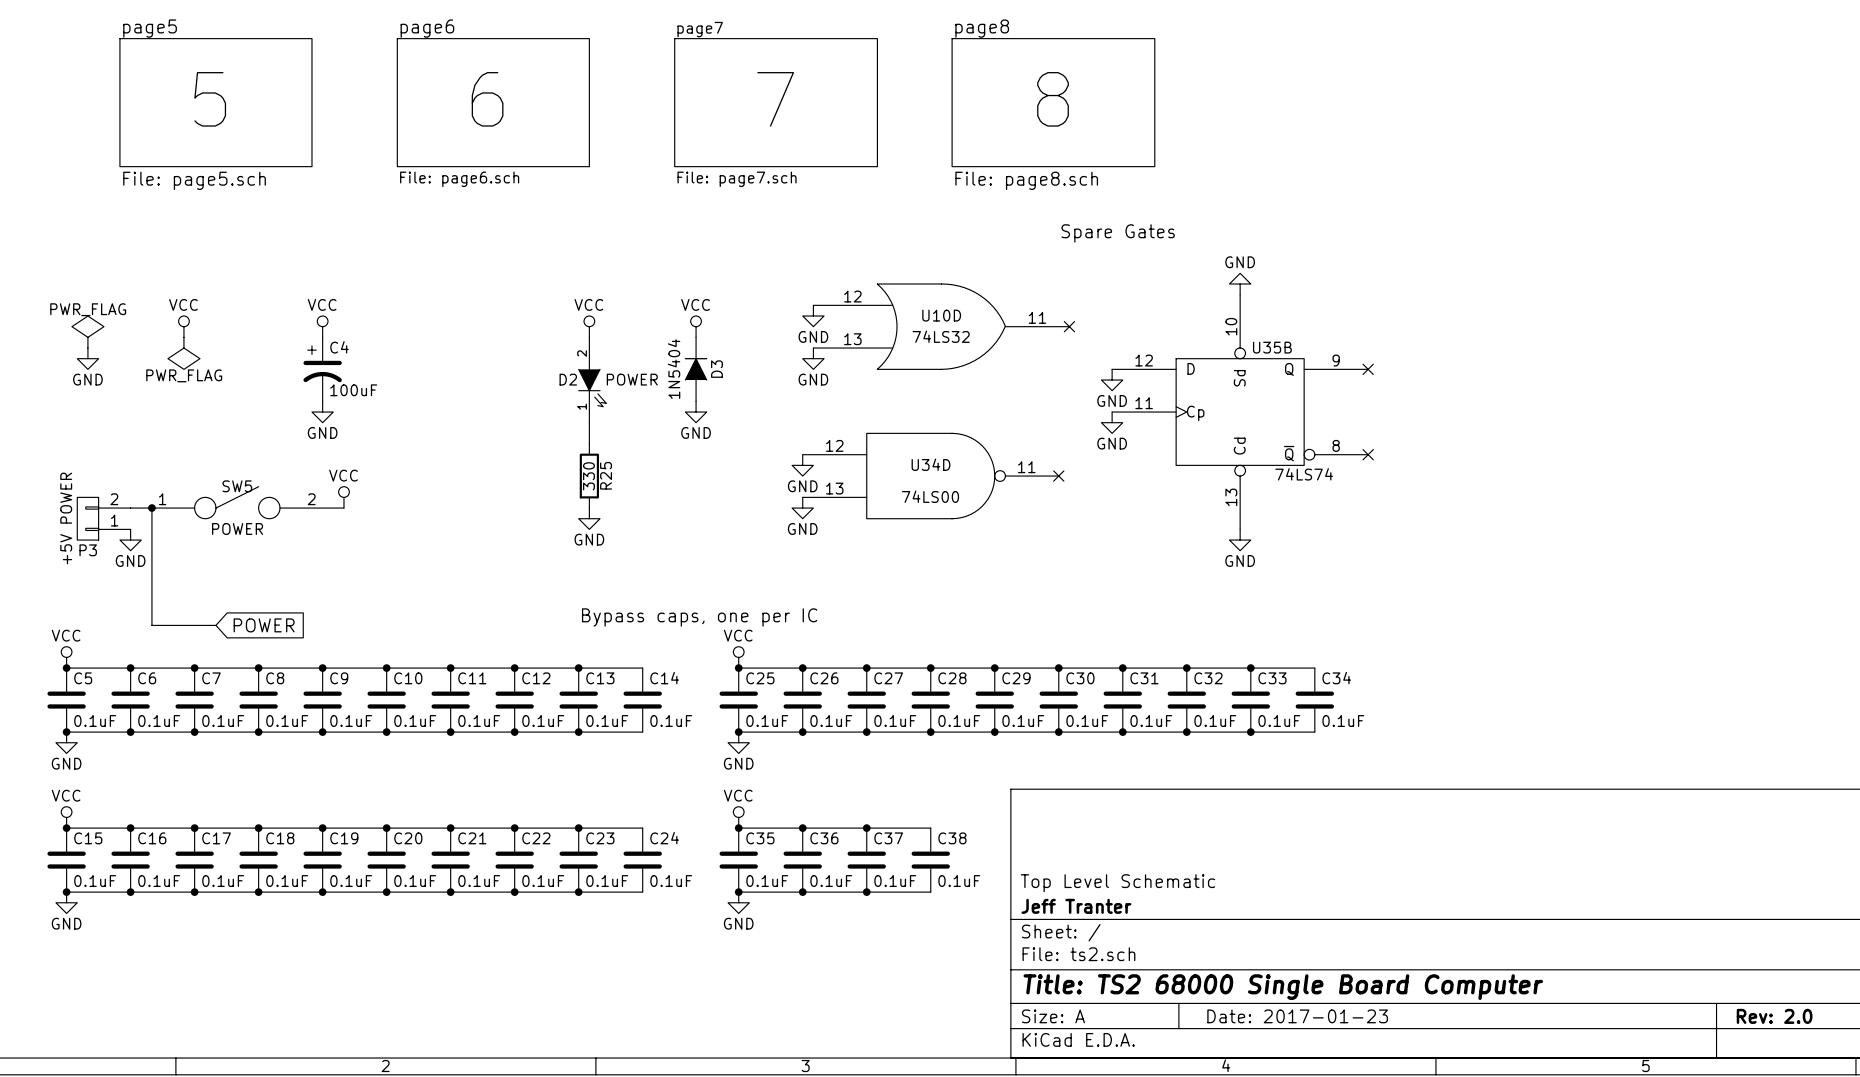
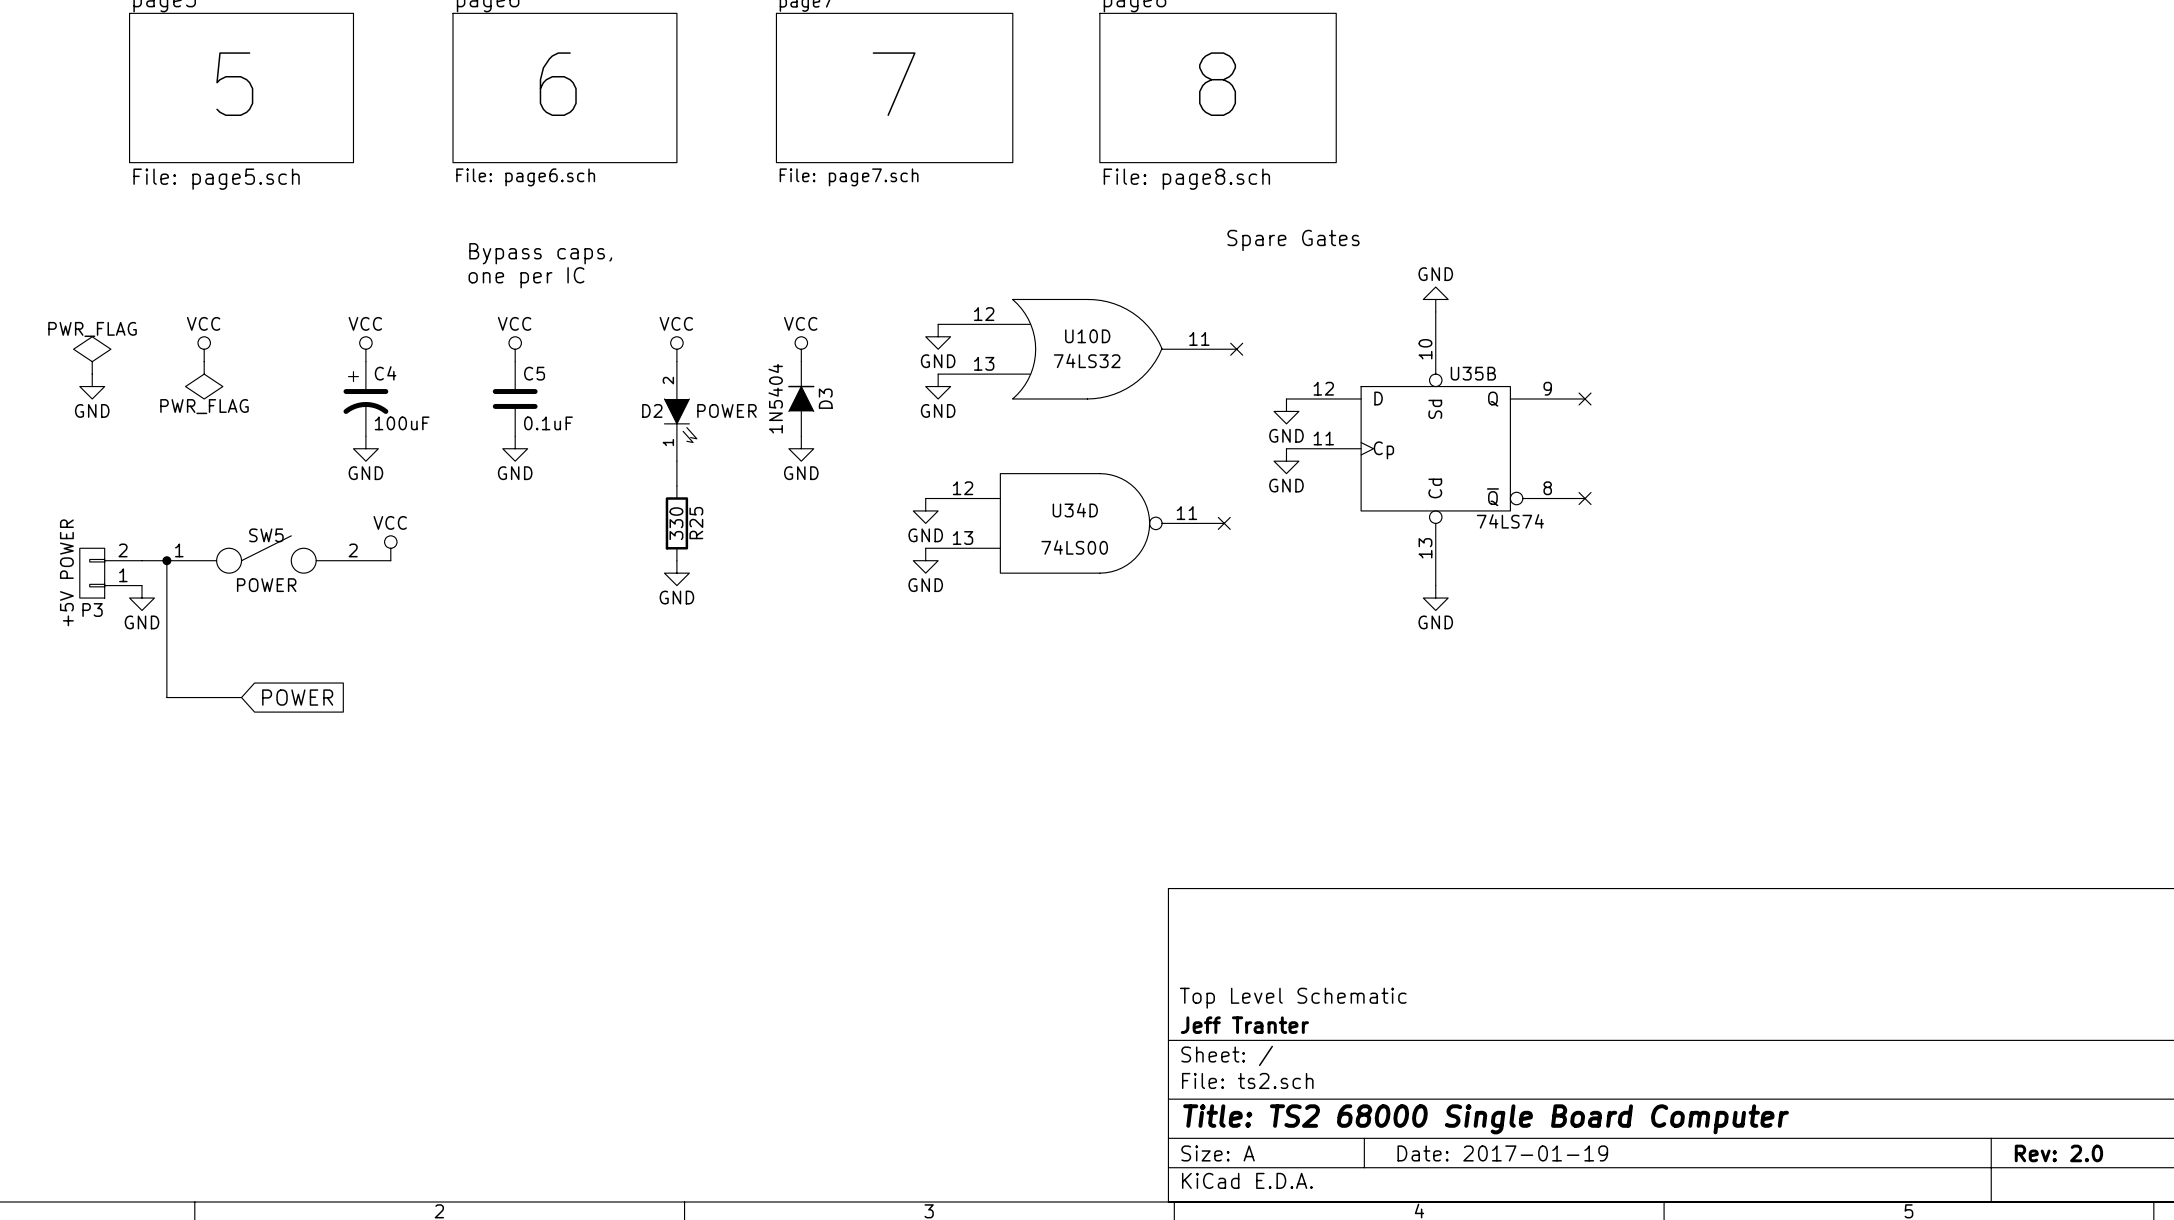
text: none -> Bypass caps, (540, 253)
text: none -> one per IC (526, 277)
power symbol: none -> VCC (515, 349)
power symbol: none -> GND (515, 448)
text: Bypass caps, one per IC (699, 617) -> none
power symbol: VCC (66, 657) -> none
power symbol: VCC (738, 657) -> none
wire: (66, 668) (642, 668) -> none
junction: (66, 668) -> none
junction: (130, 668) -> none
junction: (194, 668) -> none
junction: (258, 668) -> none
junction: (322, 668) -> none
junction: (386, 668) -> none
junction: (450, 668) -> none
junction: (514, 668) -> none
junction: (578, 668) -> none
wire: (738, 668) (1314, 668) -> none
junction: (738, 668) -> none
junction: (802, 668) -> none
junction: (866, 668) -> none
junction: (930, 668) -> none
junction: (994, 668) -> none
junction: (1058, 668) -> none
junction: (1122, 668) -> none
junction: (1186, 668) -> none
junction: (1250, 668) -> none
C5 position: (66, 700) -> (515, 398)
C6: 0.1uF (130, 700) -> none
C7: 0.1uF (194, 700) -> none
C8: 0.1uF (258, 700) -> none
C9: 0.1uF (322, 700) -> none
C10: 0.1uF (386, 700) -> none
C11: 0.1uF (450, 700) -> none
C12: 0.1uF (514, 700) -> none
C13: 0.1uF (578, 700) -> none
C14: 0.1uF (642, 700) -> none
C25: 0.1uF (738, 700) -> none
C26: 0.1uF (802, 700) -> none
C27: 0.1uF (866, 700) -> none
C28: 0.1uF (930, 700) -> none
C29: 0.1uF (994, 700) -> none
C30: 0.1uF (1058, 700) -> none
C31: 0.1uF (1122, 700) -> none
C32: 0.1uF (1186, 700) -> none
C33: 0.1uF (1250, 700) -> none
C34: 0.1uF (1314, 700) -> none
wire: (66, 732) (642, 732) -> none
junction: (66, 732) -> none
junction: (130, 732) -> none
junction: (194, 732) -> none
junction: (258, 732) -> none
junction: (322, 732) -> none
junction: (386, 732) -> none
junction: (450, 732) -> none
junction: (514, 732) -> none
junction: (578, 732) -> none
wire: (738, 732) (1314, 732) -> none
junction: (738, 732) -> none
junction: (802, 732) -> none
junction: (866, 732) -> none
junction: (930, 732) -> none
junction: (994, 732) -> none
junction: (1058, 732) -> none
junction: (1122, 732) -> none
junction: (1186, 732) -> none
junction: (1250, 732) -> none
power symbol: GND (66, 742) -> none
power symbol: GND (738, 742) -> none
power symbol: VCC (66, 817) -> none
power symbol: VCC (738, 817) -> none
wire: (66, 828) (642, 828) -> none
junction: (66, 828) -> none
junction: (130, 828) -> none
junction: (194, 828) -> none
junction: (258, 828) -> none
junction: (322, 828) -> none
junction: (386, 828) -> none
junction: (450, 828) -> none
junction: (514, 828) -> none
junction: (578, 828) -> none
wire: (738, 828) (930, 828) -> none
junction: (738, 828) -> none
junction: (802, 828) -> none
junction: (866, 828) -> none
C15: 0.1uF (66, 860) -> none
C16: 0.1uF (130, 860) -> none
C17: 0.1uF (194, 860) -> none
C18: 0.1uF (258, 860) -> none
C19: 0.1uF (322, 860) -> none
C20: 0.1uF (386, 860) -> none
C21: 0.1uF (450, 860) -> none
C22: 0.1uF (514, 860) -> none
C23: 0.1uF (578, 860) -> none
C24: 0.1uF (642, 860) -> none
C35: 0.1uF (738, 860) -> none
C36: 0.1uF (802, 860) -> none
C37: 0.1uF (866, 860) -> none
C38: 0.1uF (930, 860) -> none
wire: (66, 892) (642, 892) -> none
junction: (66, 892) -> none
junction: (130, 892) -> none
junction: (194, 892) -> none
junction: (258, 892) -> none
junction: (322, 892) -> none
junction: (386, 892) -> none
junction: (450, 892) -> none
junction: (514, 892) -> none
junction: (578, 892) -> none
wire: (738, 892) (930, 892) -> none
junction: (738, 892) -> none
junction: (802, 892) -> none
junction: (866, 892) -> none
power symbol: GND (66, 902) -> none
power symbol: GND (738, 902) -> none
title block: Date: 2017-01-23 (1297, 1016) -> Date: 2017-01-19 (1502, 1153)

